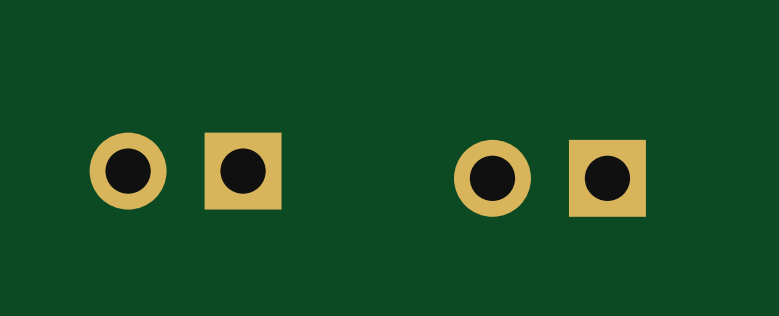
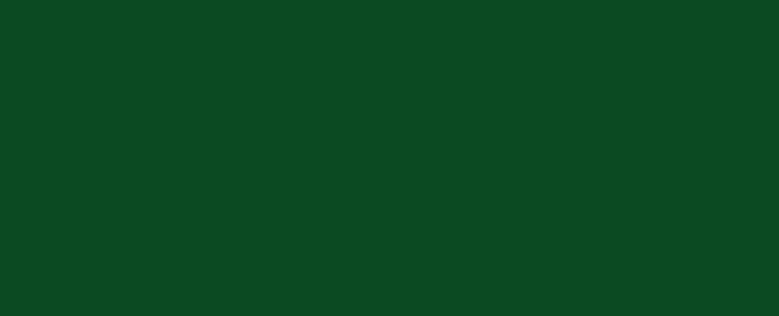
part: (185, 171) -> none
part: (549, 178) -> none

